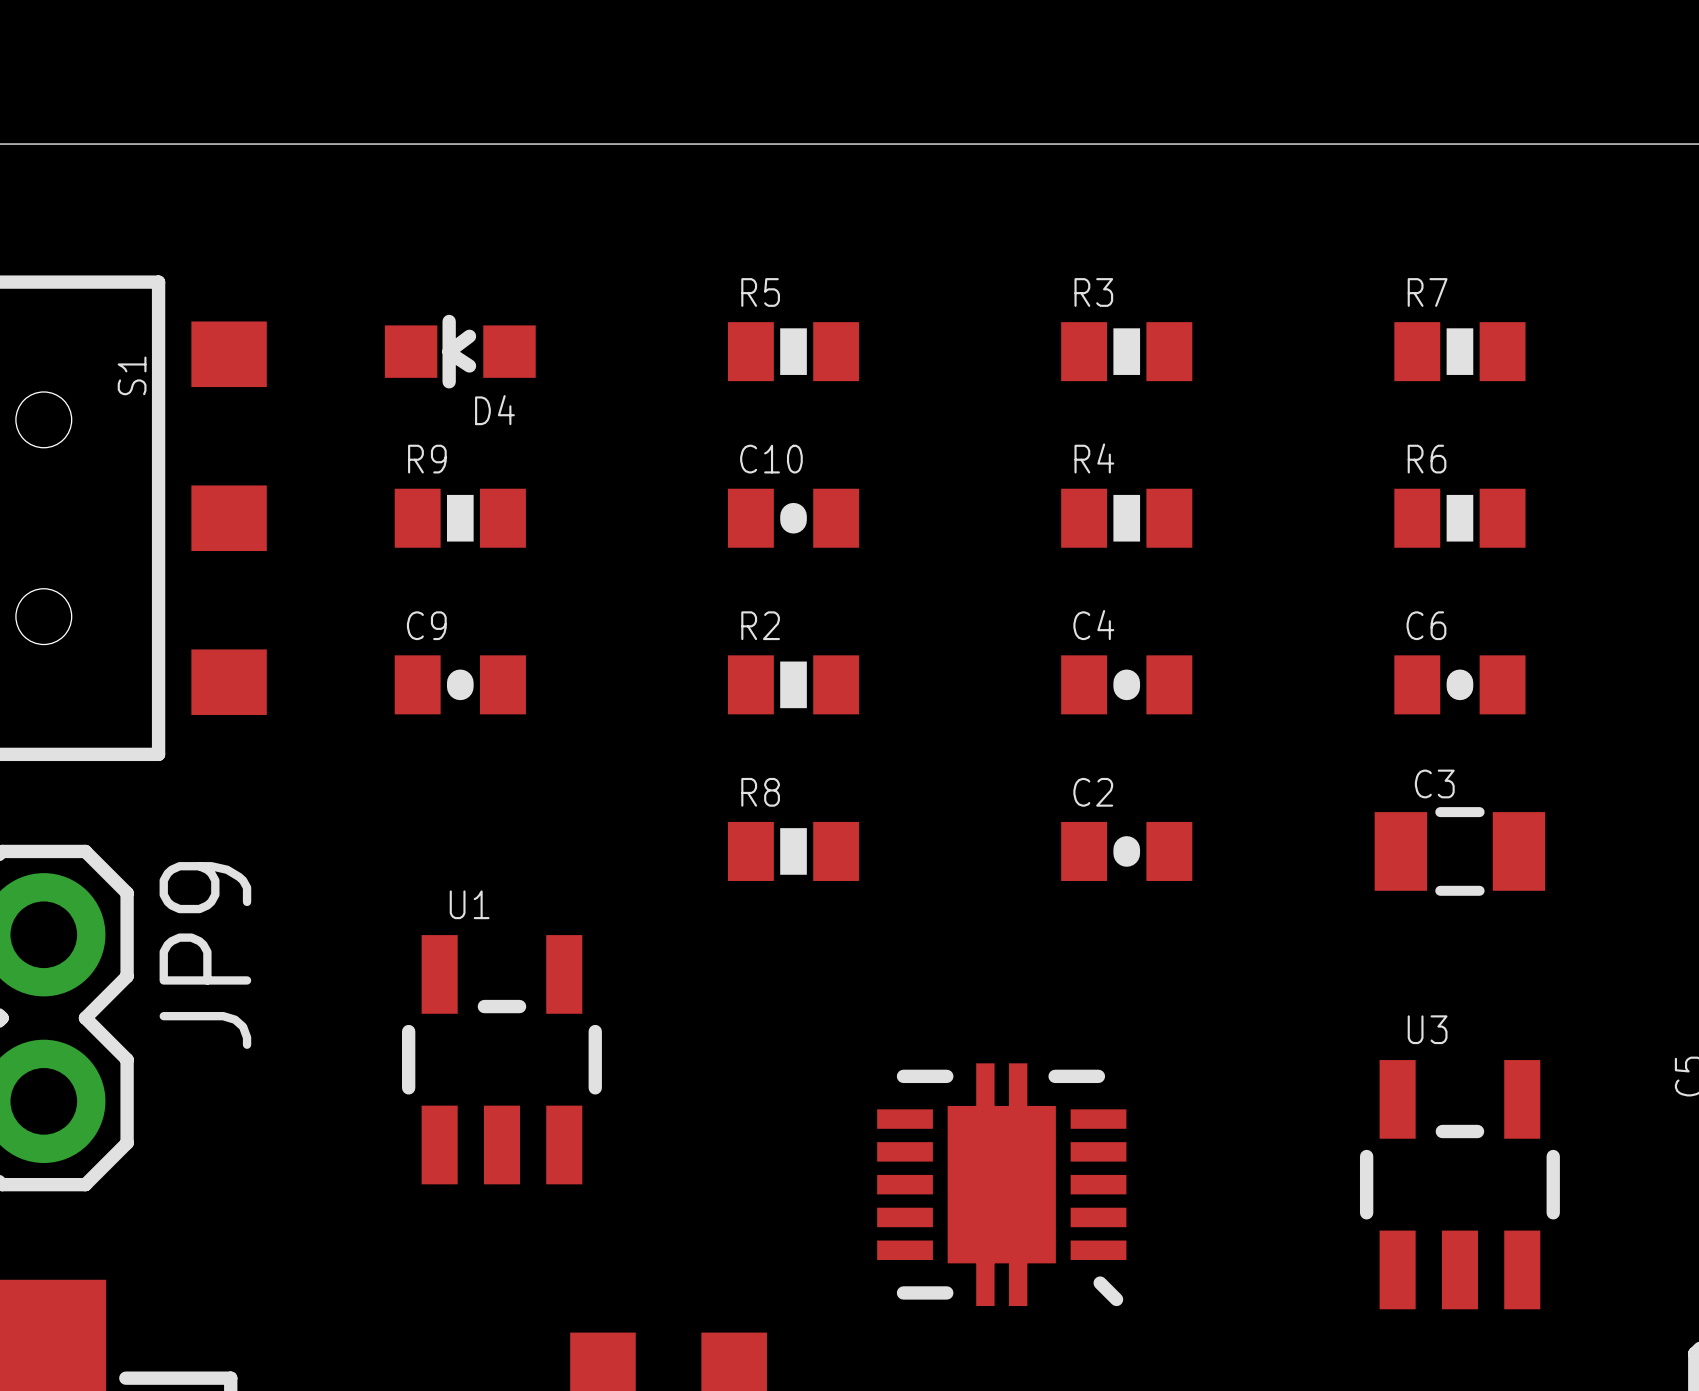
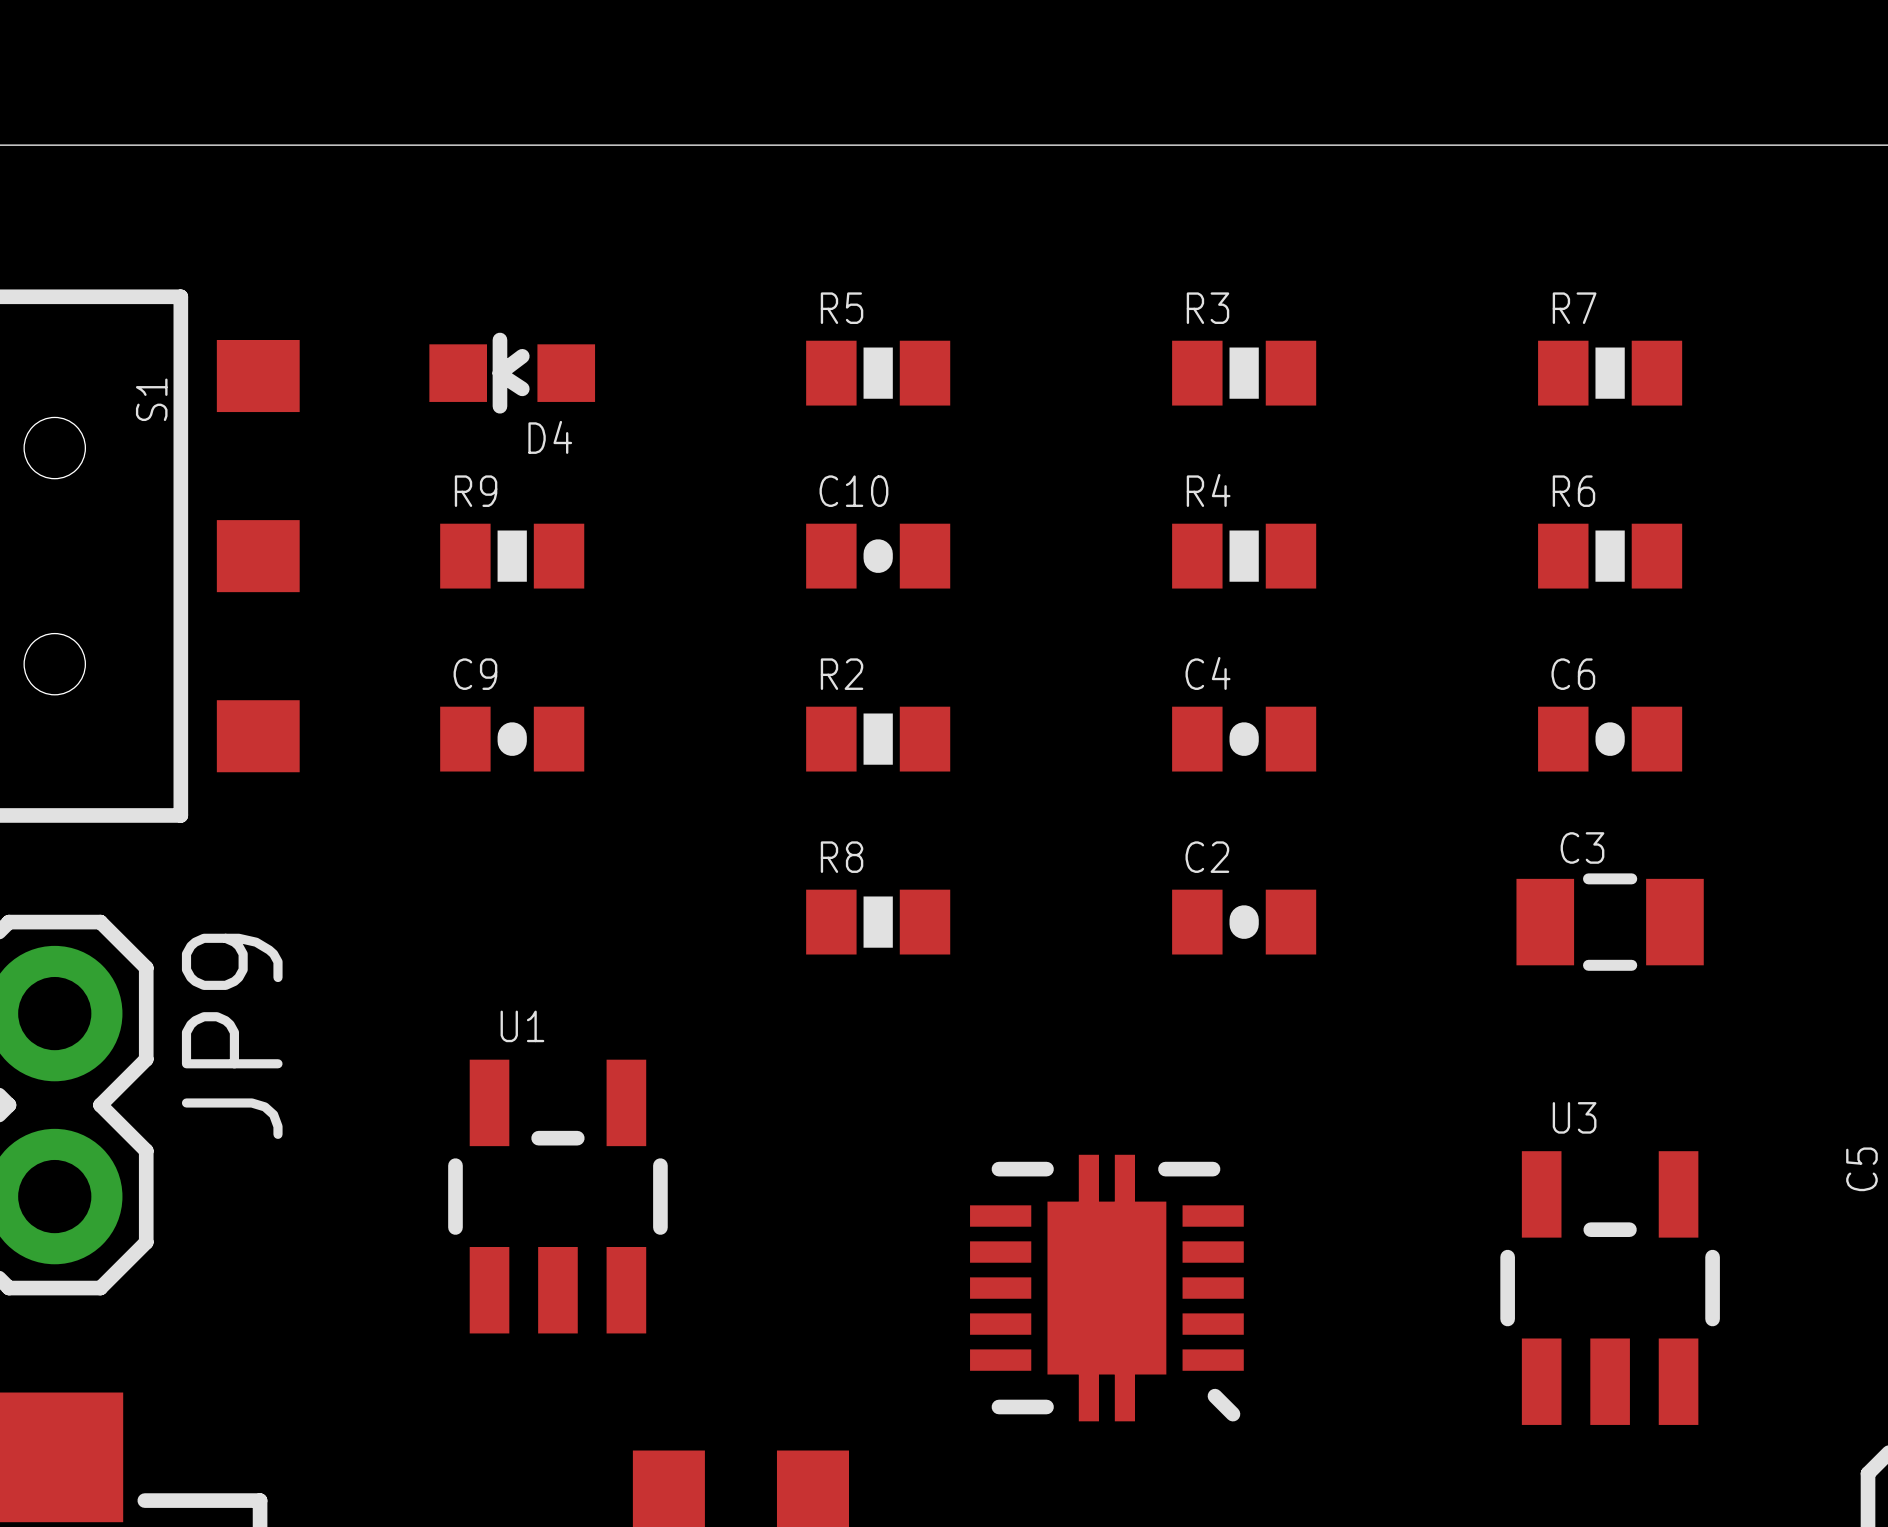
U1 position: (501, 1059) -> (557, 1196)

